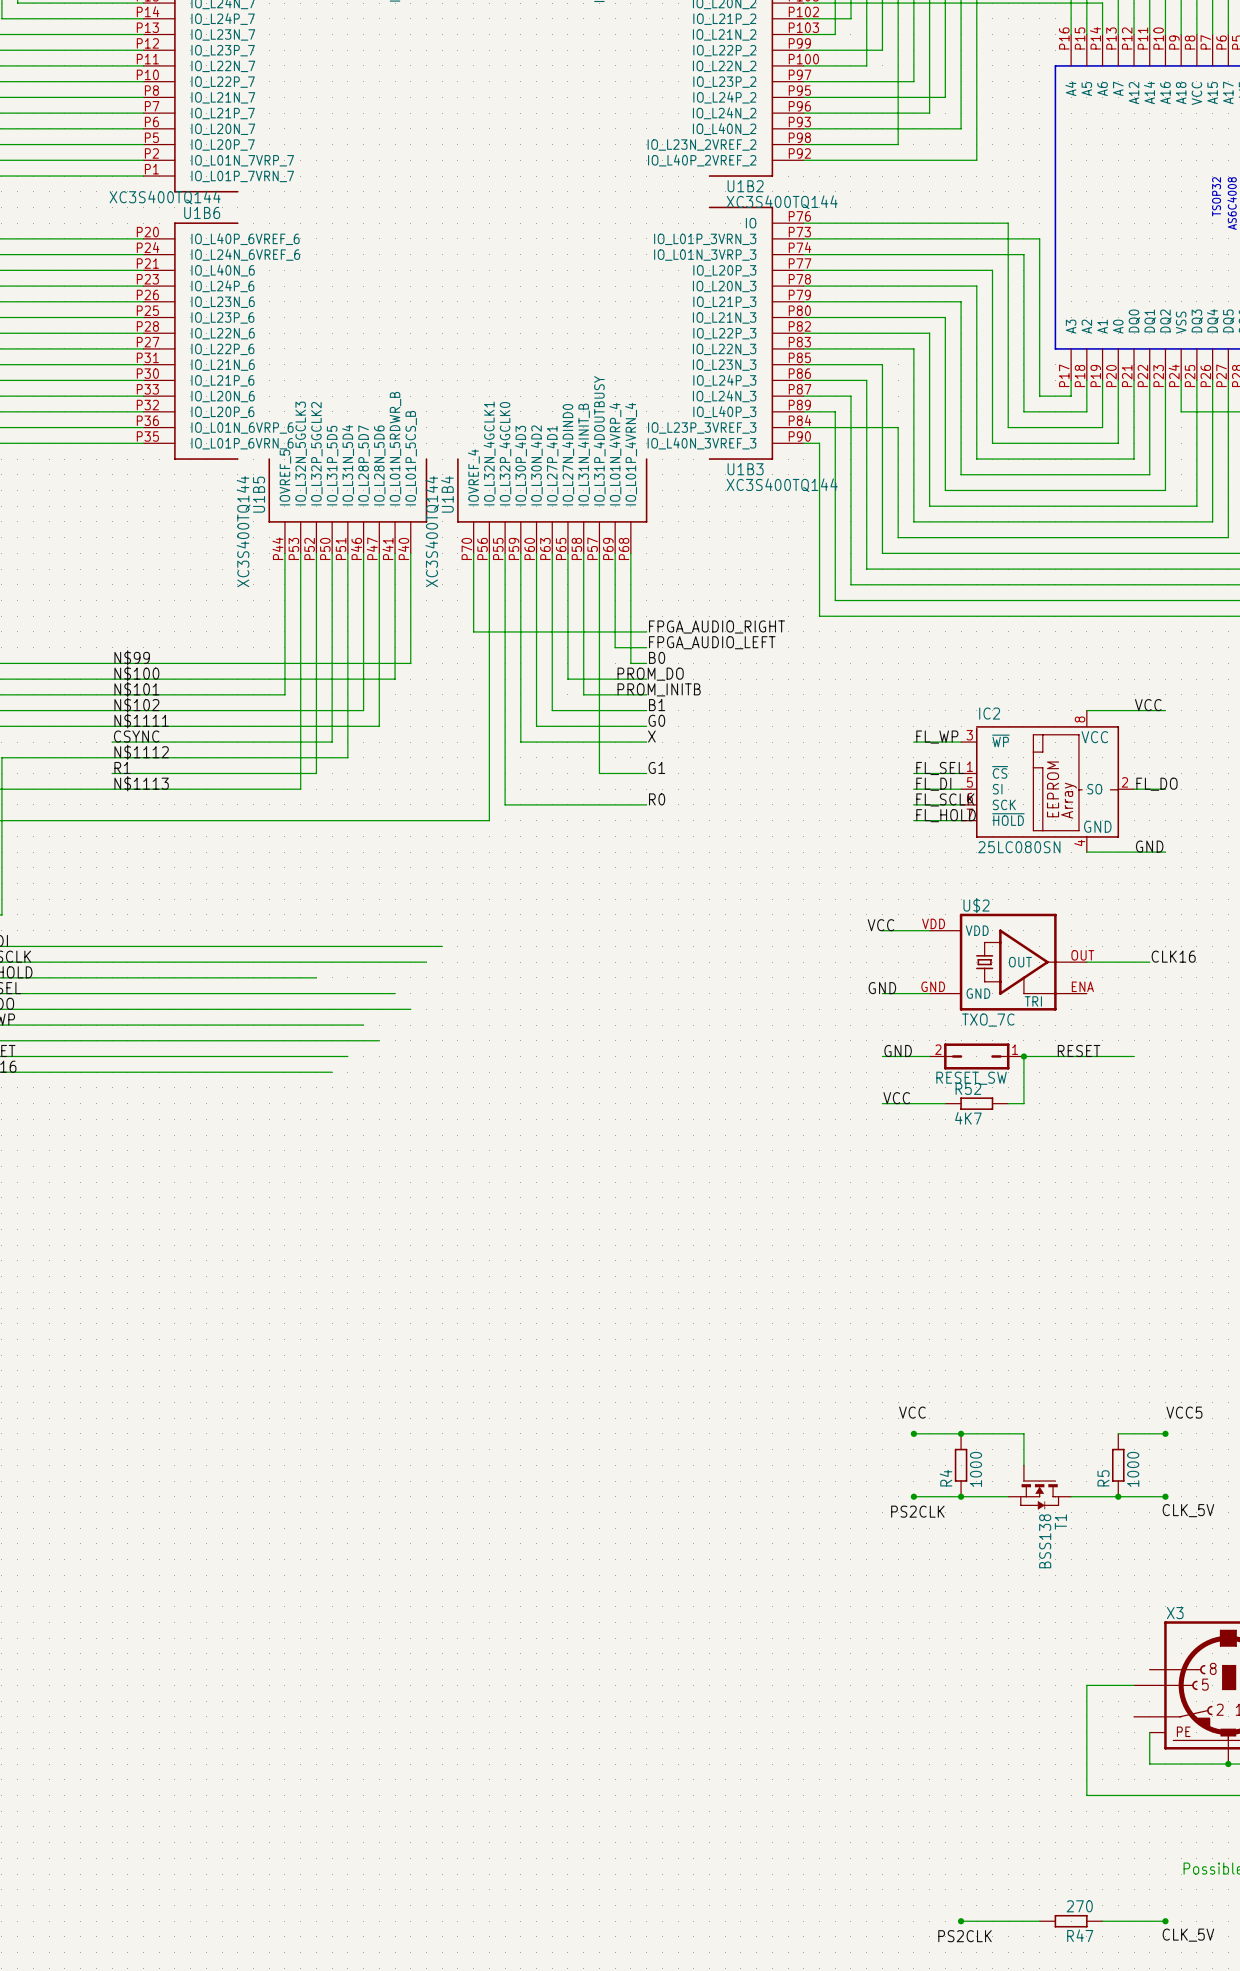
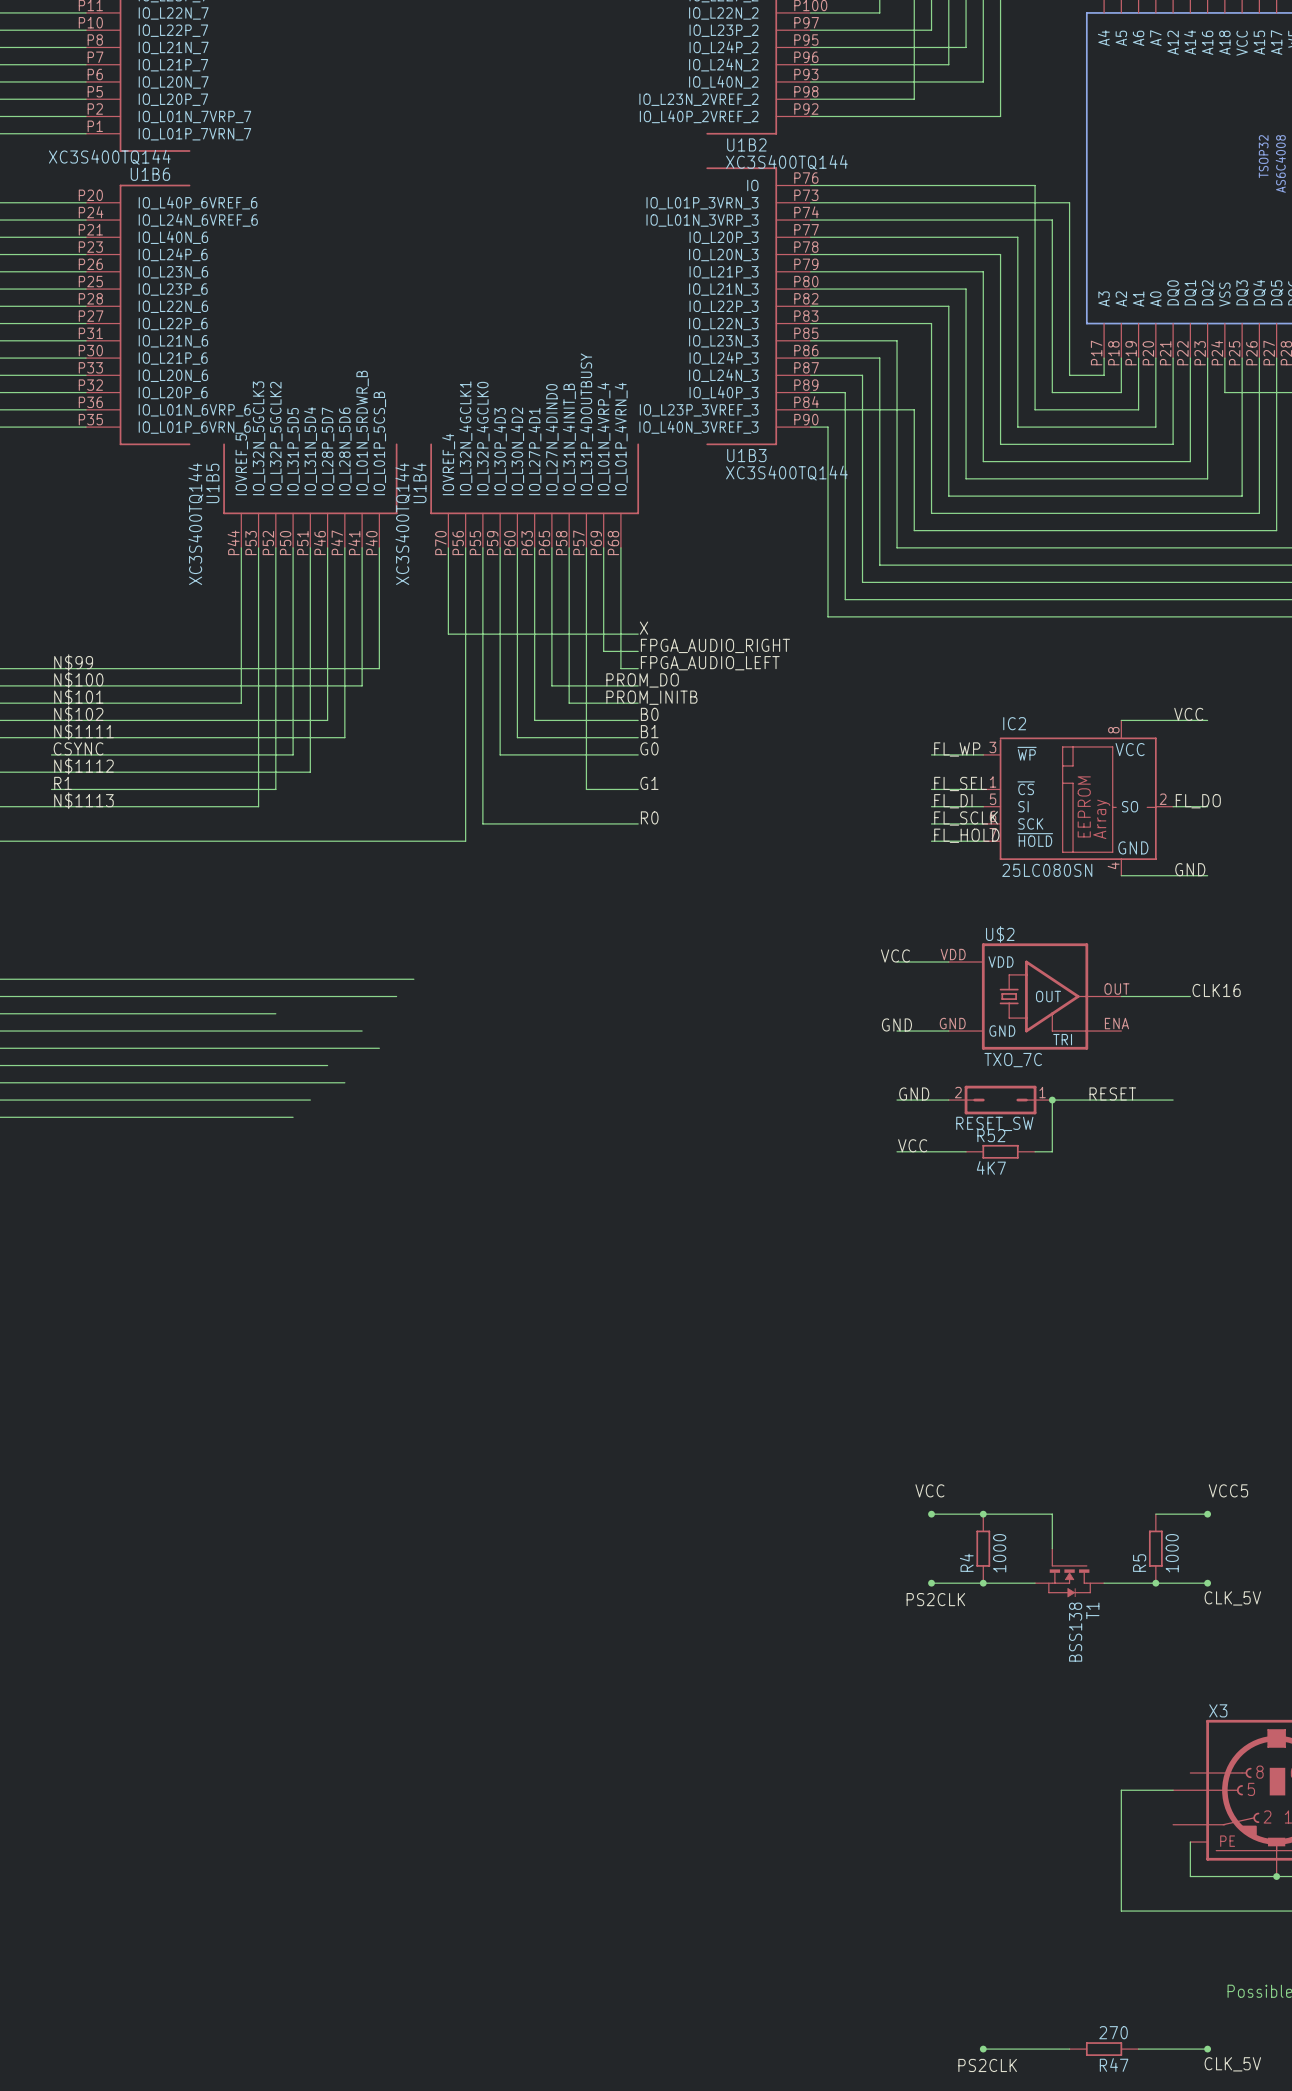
label: FPGA_AUDIO_RIGHT (716, 626) -> X (644, 628)
label: FPGA_AUDIO_LEFT (712, 642) -> FPGA_AUDIO_RIGHT (715, 645)
label: B0 (657, 657) -> FPGA_AUDIO_LEFT (710, 663)
label: B1 (657, 705) -> B0 (649, 714)
label: G0 (656, 720) -> B1 (649, 731)
label: X (651, 736) -> G0 (649, 748)

